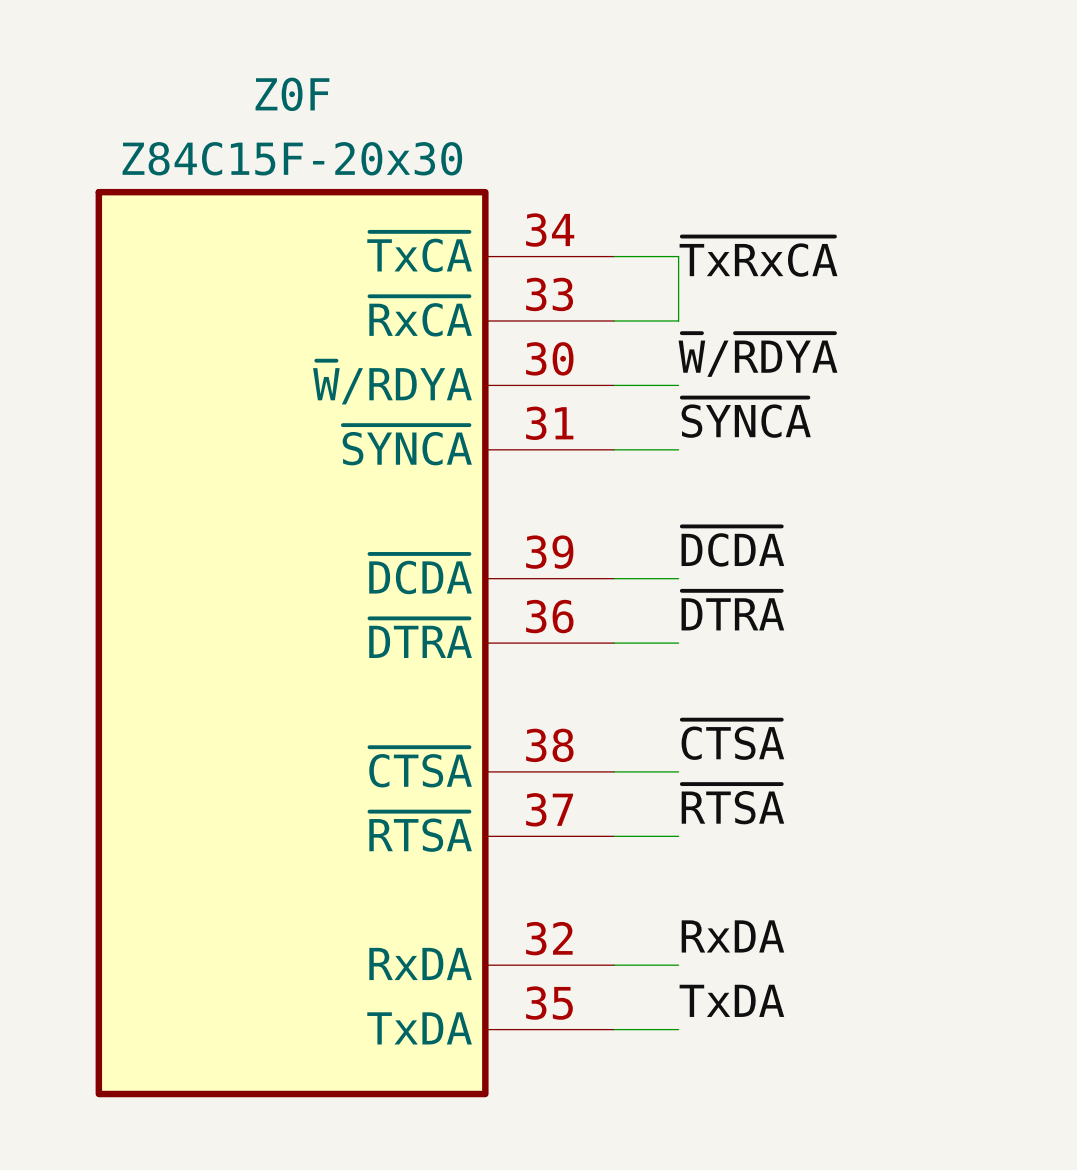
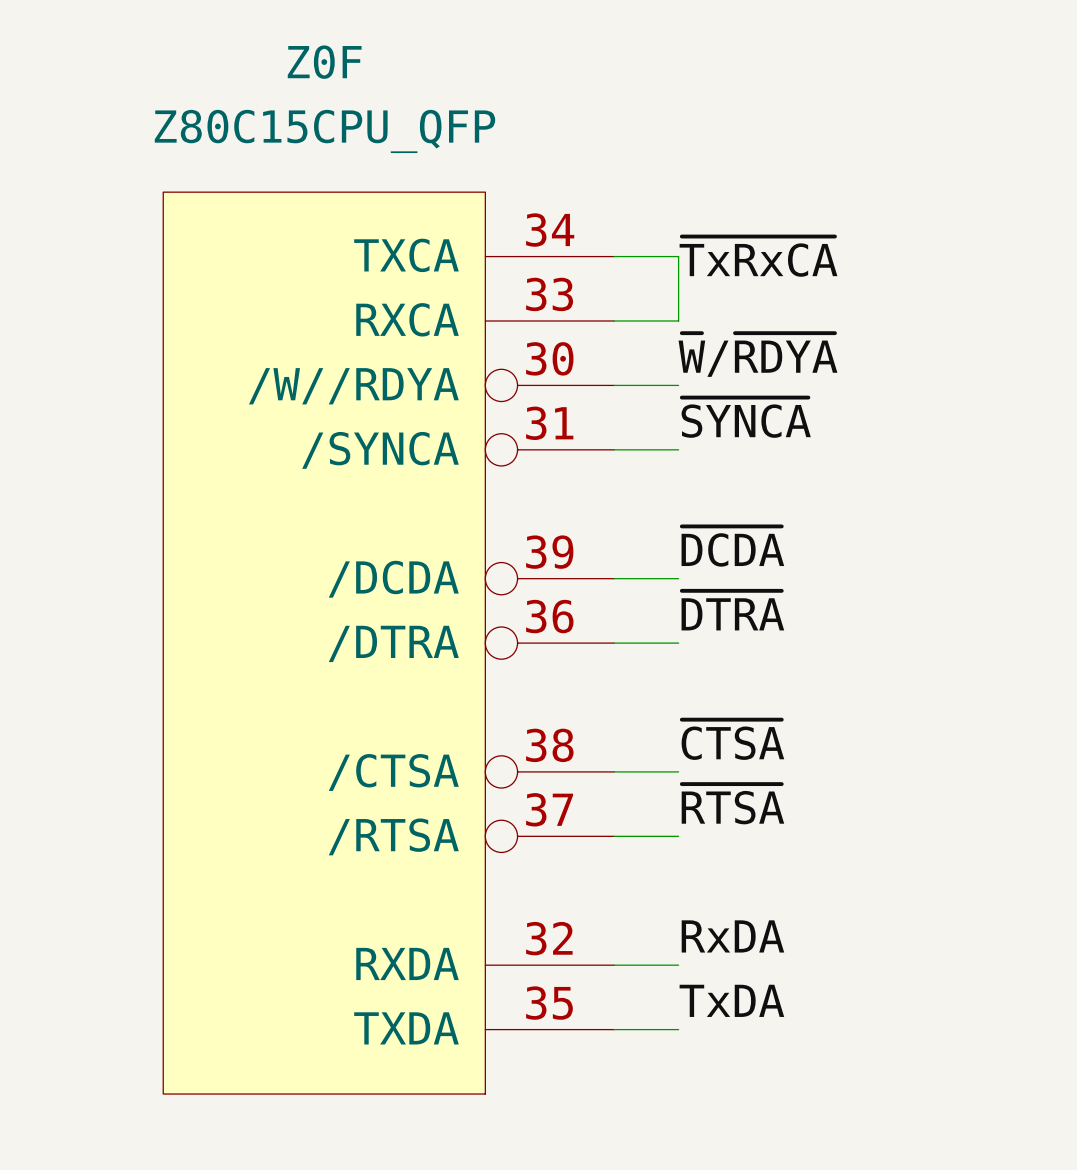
Z0F value: Z84C15F-20x30 (292, 158) -> Z80C15CPU_QFP (324, 131)
Z0F symbol: [95, 188, 615, 1098] -> [163, 192, 615, 1095]

